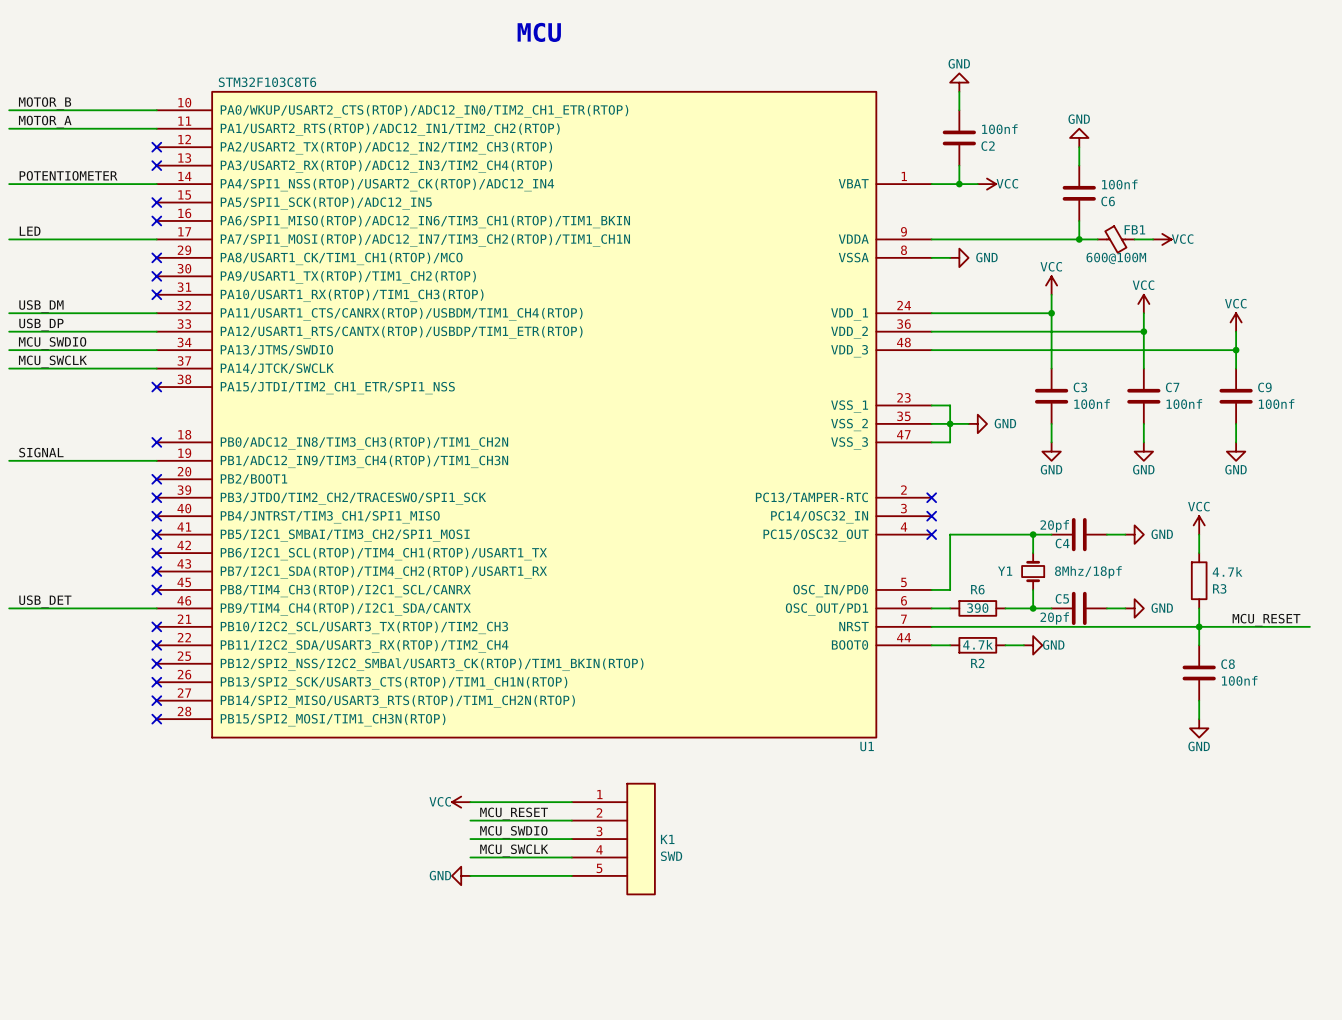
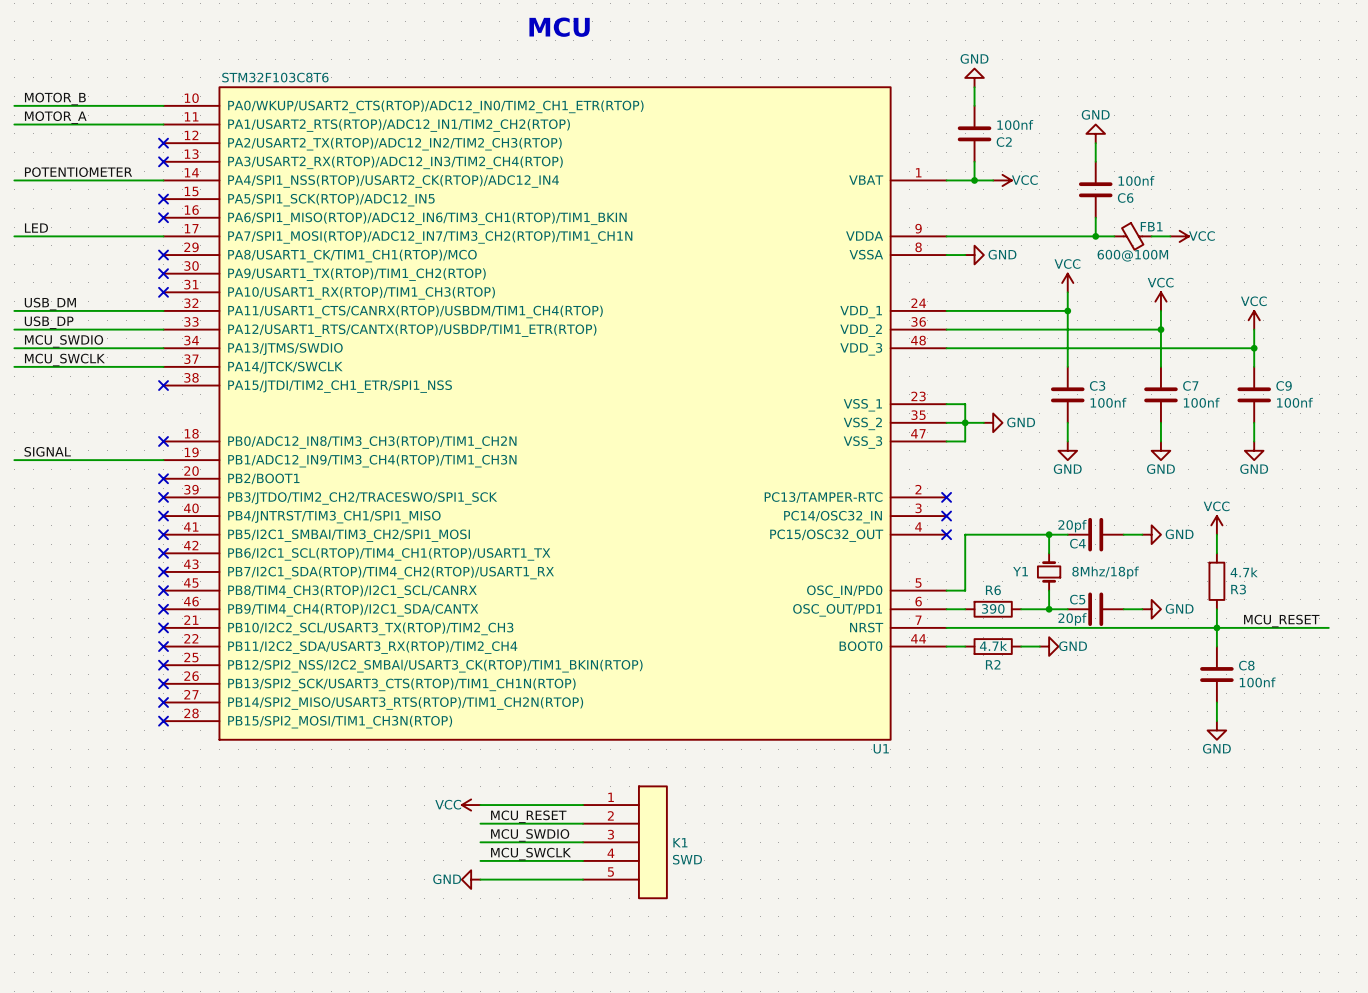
label: USB_DET (45, 601) -> none
wire: (9, 608) (156, 608) -> none
no-connect mark: none -> (163, 609)

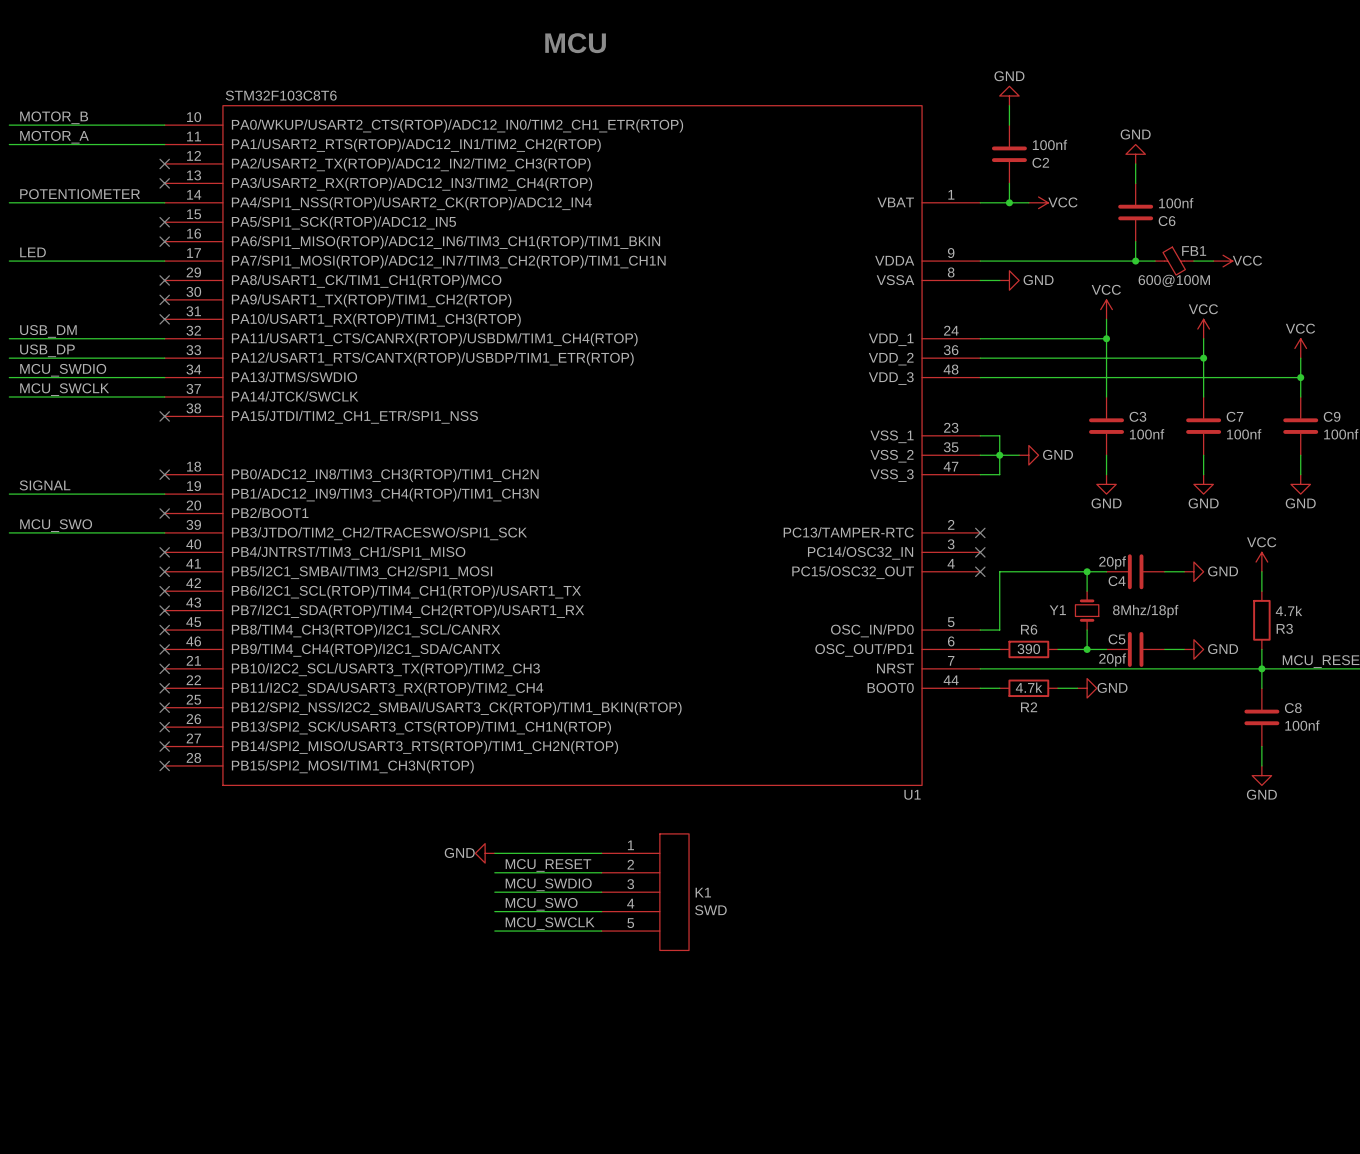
label: none -> MCU_SWO (56, 525)
wire: none -> (9, 532) (164, 532)
no-connect mark: (163, 497) -> none
power symbol: VCC (471, 805) -> GND (485, 853)
label: MCU_SWCLK (531, 854) -> MCU_SWO (541, 904)
label: none -> MCU_SWCLK (550, 923)
power symbol: GND (471, 879) -> none

